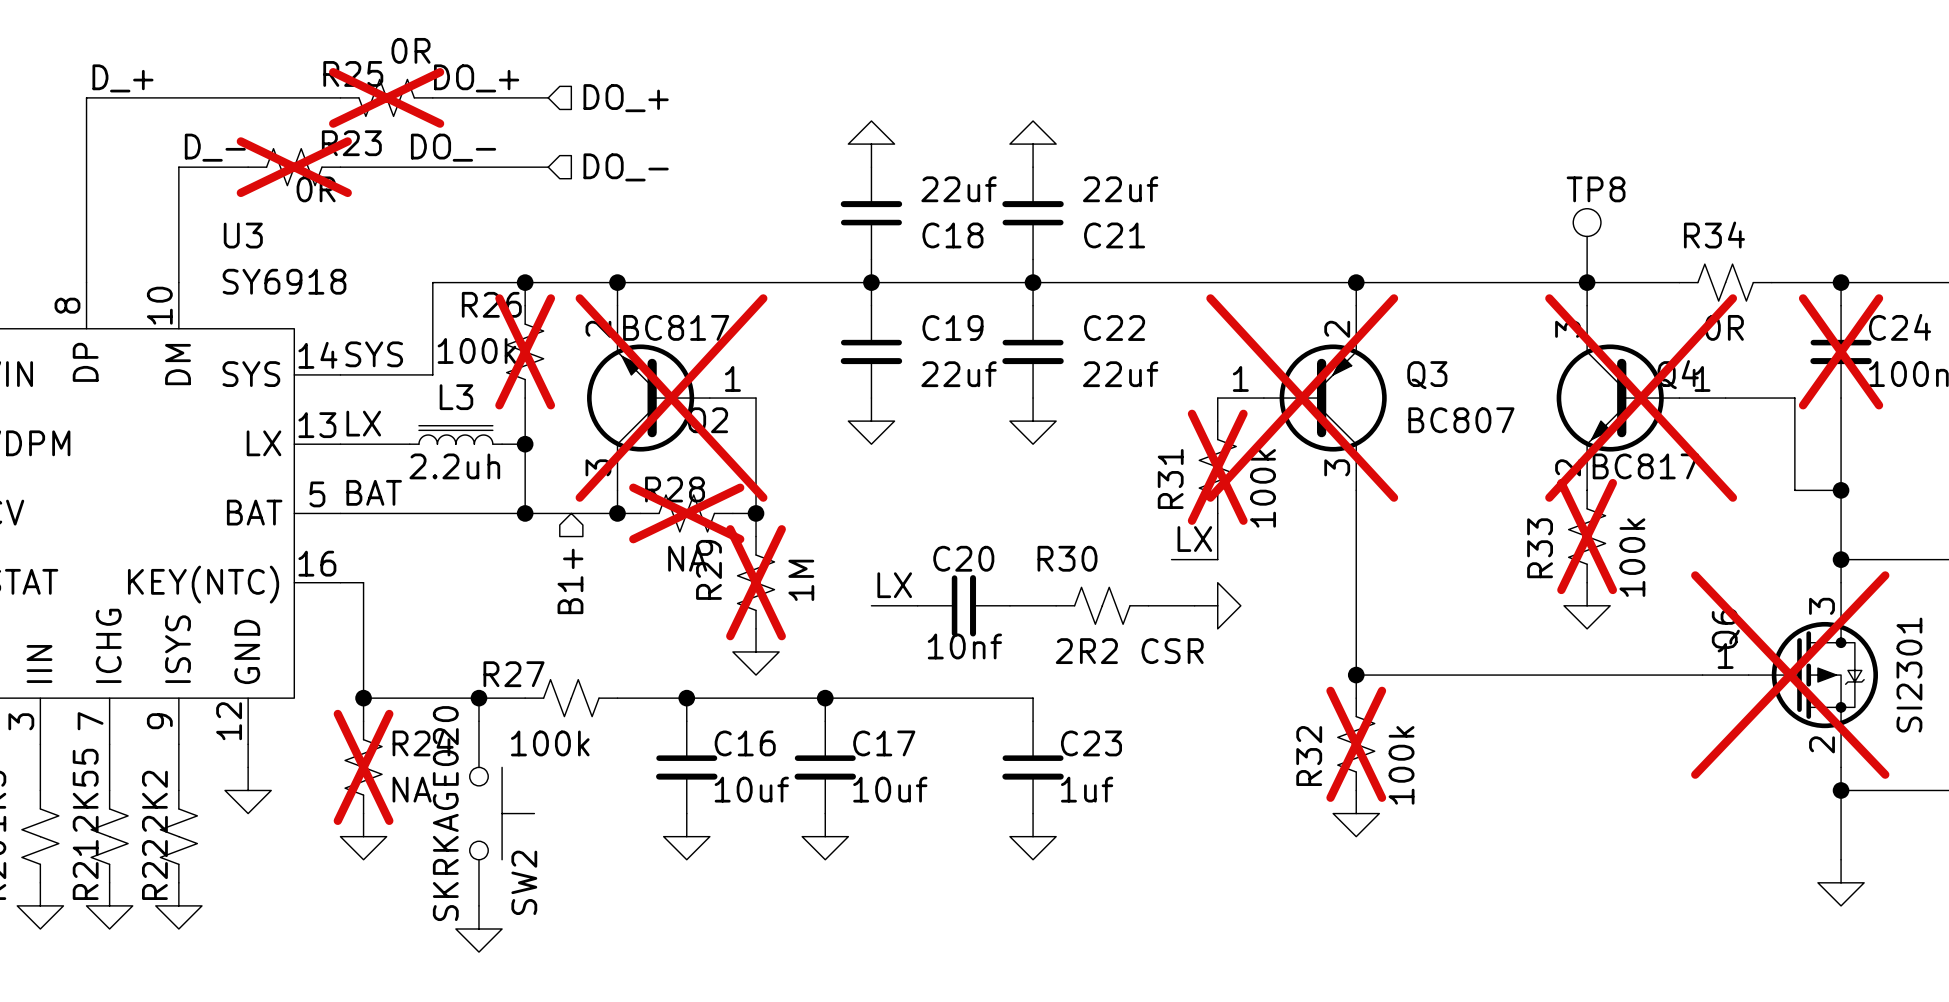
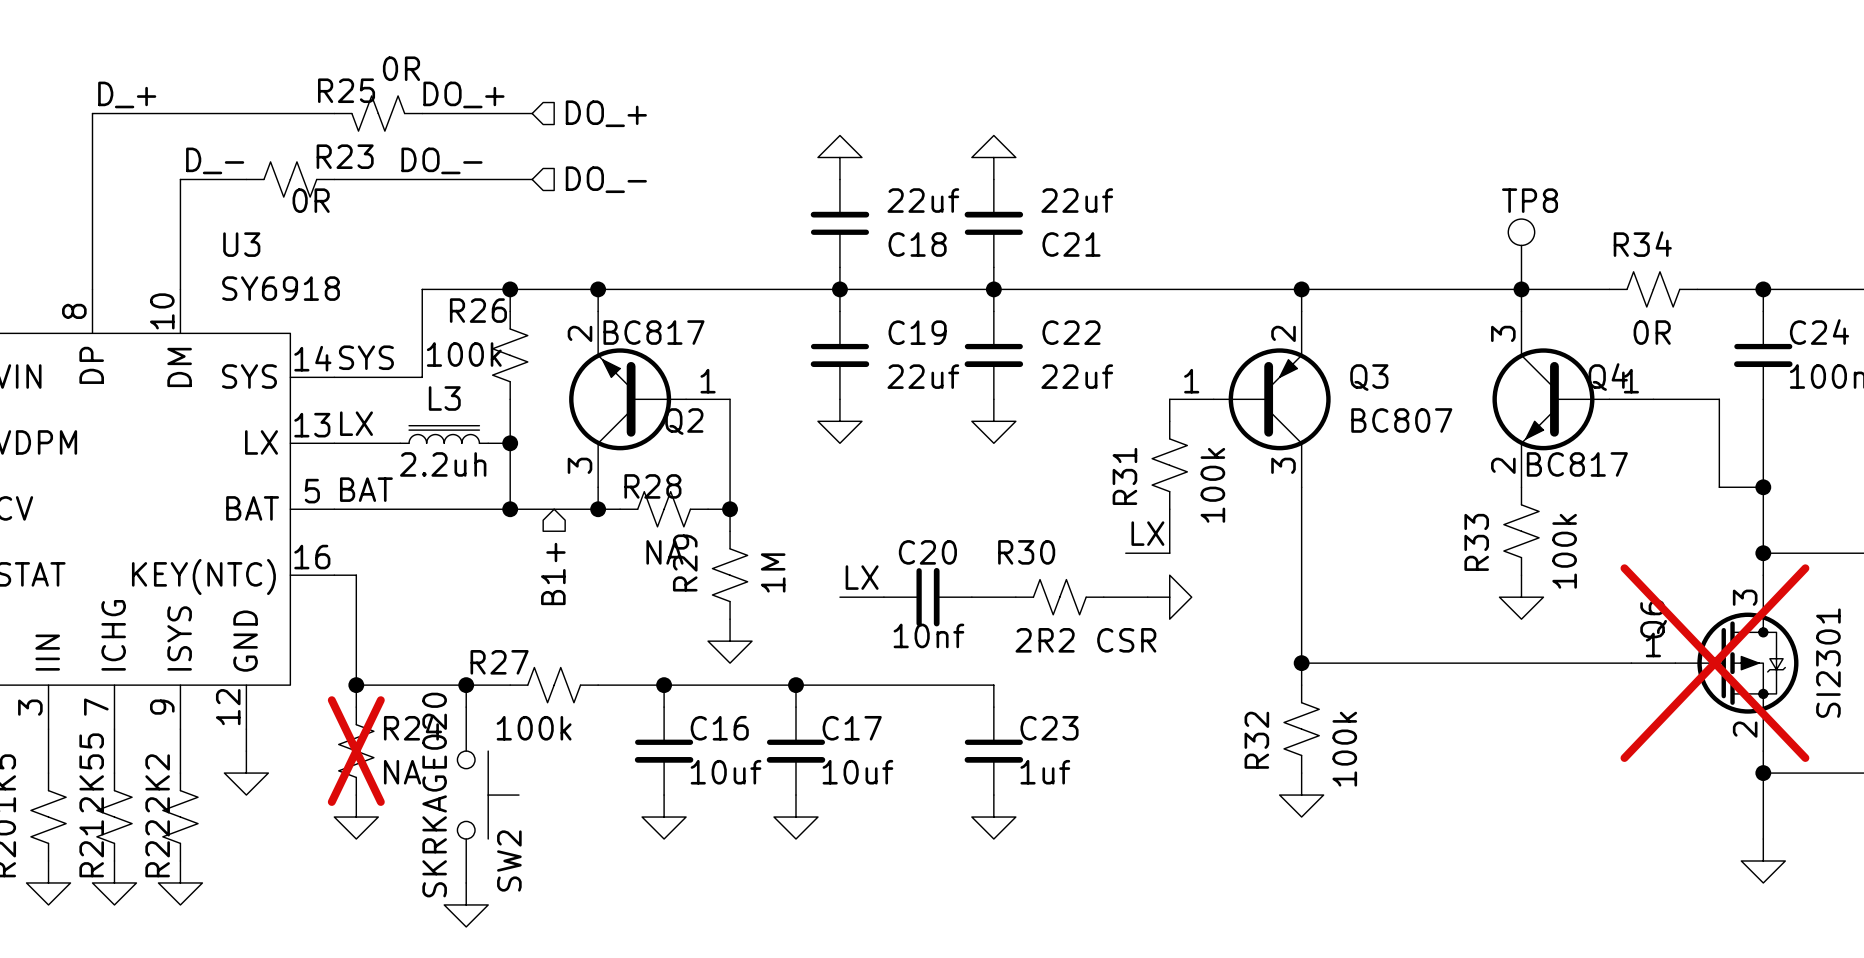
R25 do-not-place cross: (386, 97) -> none
R23 do-not-place cross: (294, 167) -> none
R26 do-not-place cross: (525, 351) -> none
C24 do-not-place cross: (1841, 351) -> none
Q2 do-not-place cross: (671, 398) -> none
Q3 do-not-place cross: (1302, 398) -> none
Q4 do-not-place cross: (1641, 398) -> none
R31 do-not-place cross: (1217, 467) -> none
R28 do-not-place cross: (686, 513) -> none
R33 do-not-place cross: (1587, 536) -> none
R29 do-not-place cross: (756, 582) -> none
R32 do-not-place cross: (1356, 744) -> none

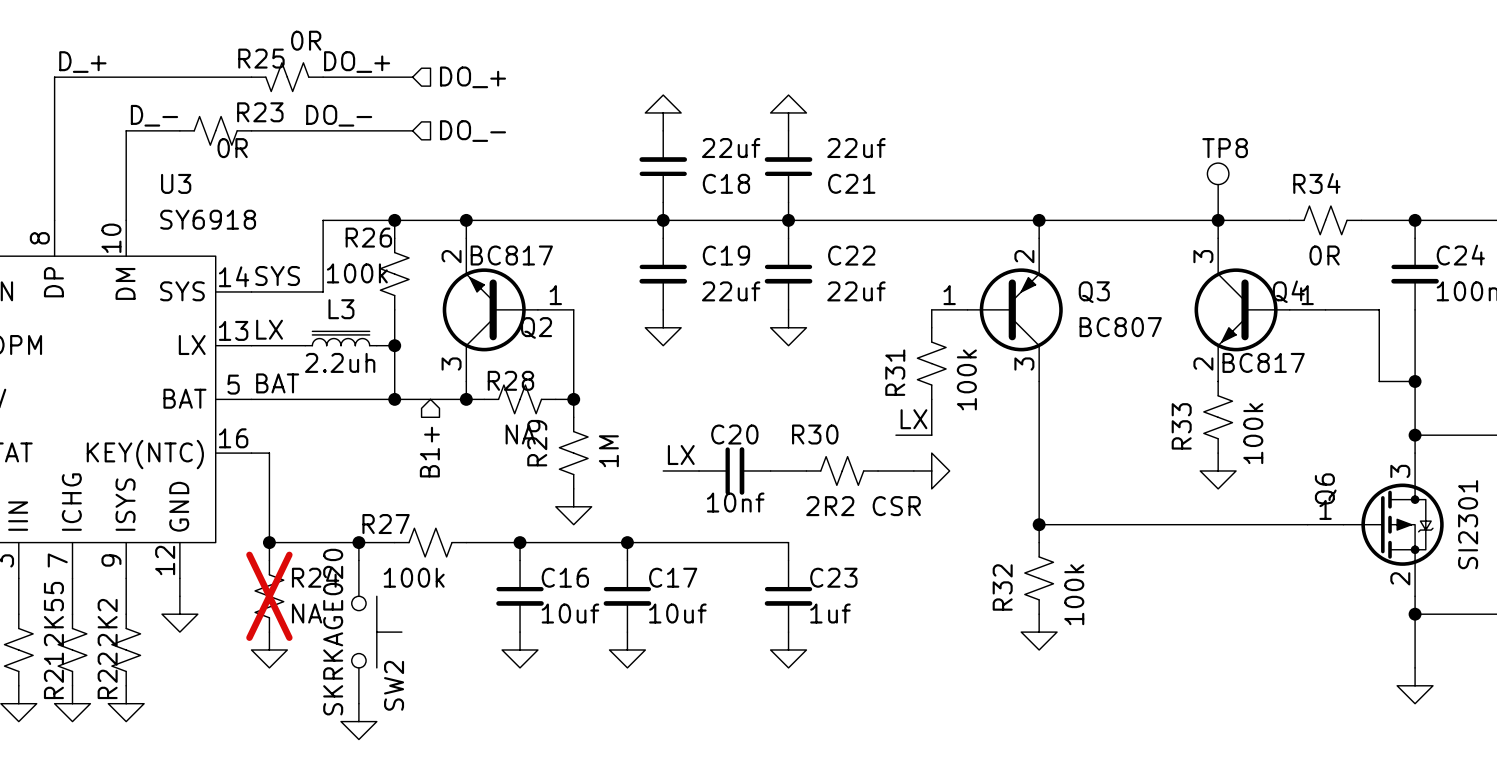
Q6 do-not-place cross: (1714, 663) -> none

